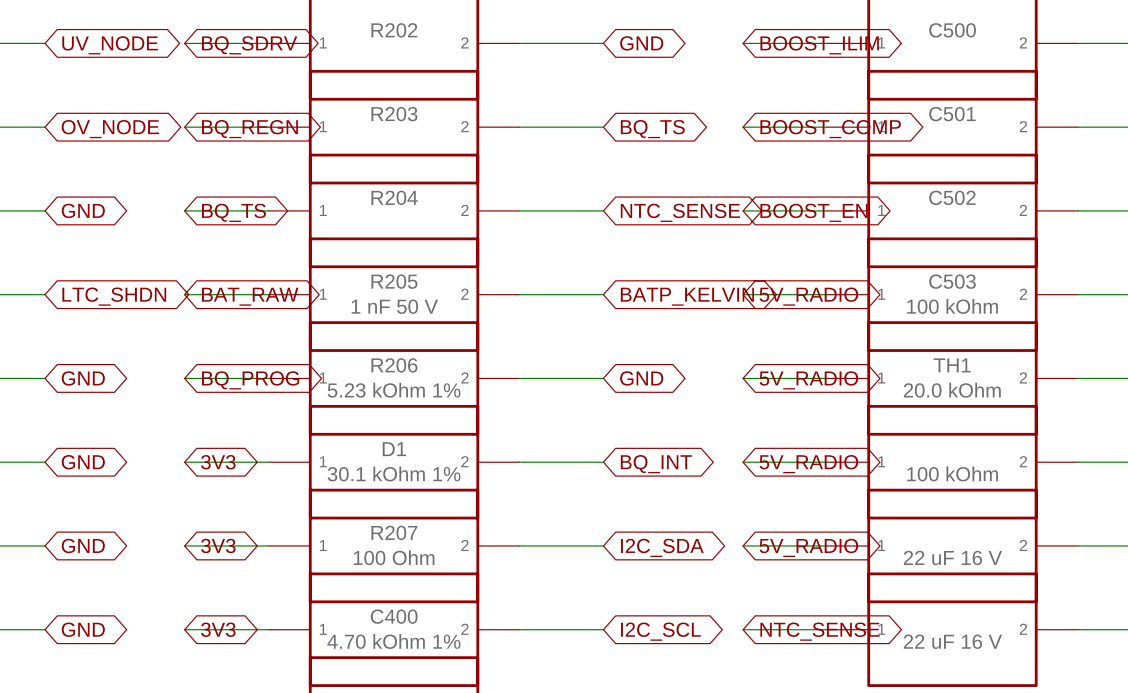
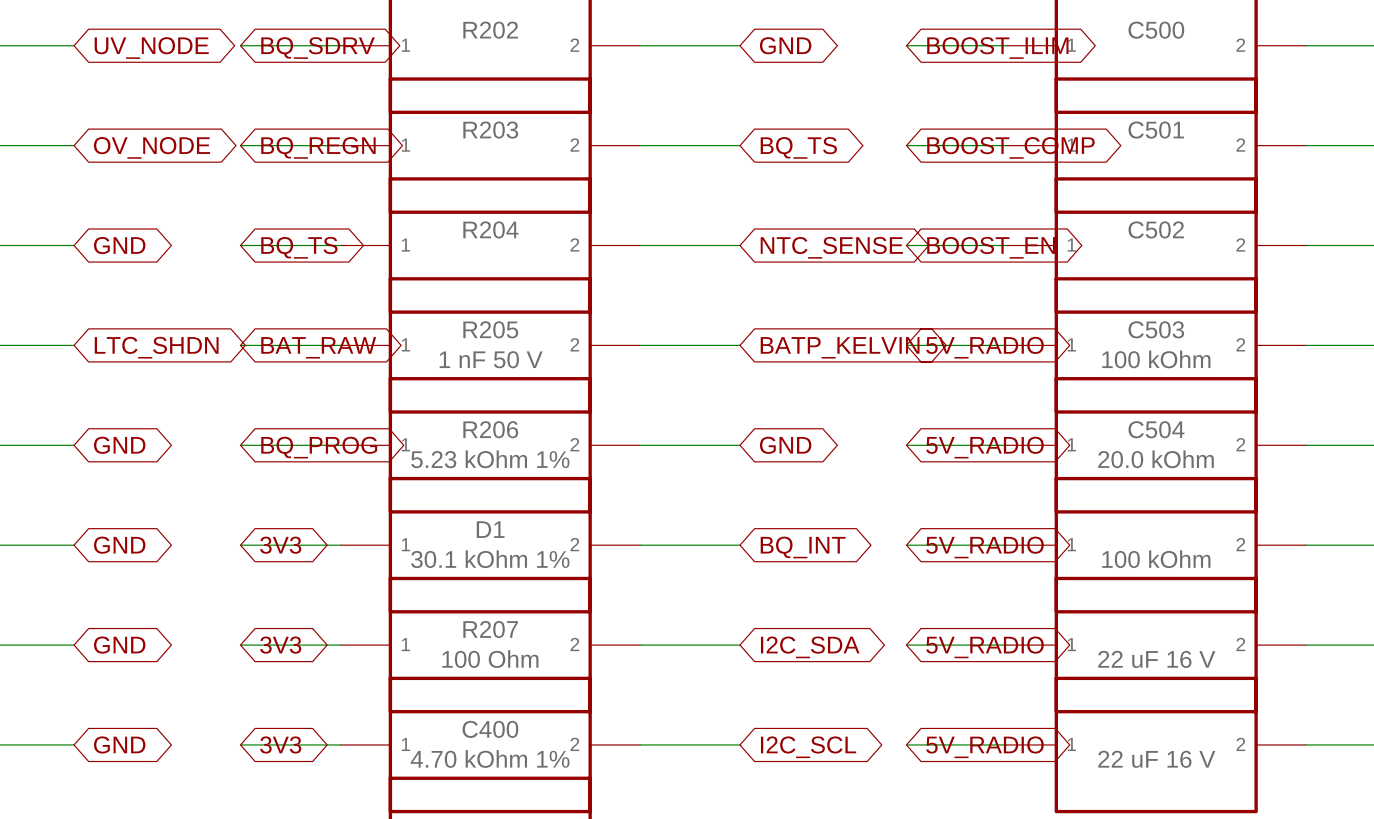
TH1 name: TH1 (952, 365) -> C504 (1156, 429)
global label: NTC_SENSE (820, 631) -> 5V_RADIO (984, 747)

